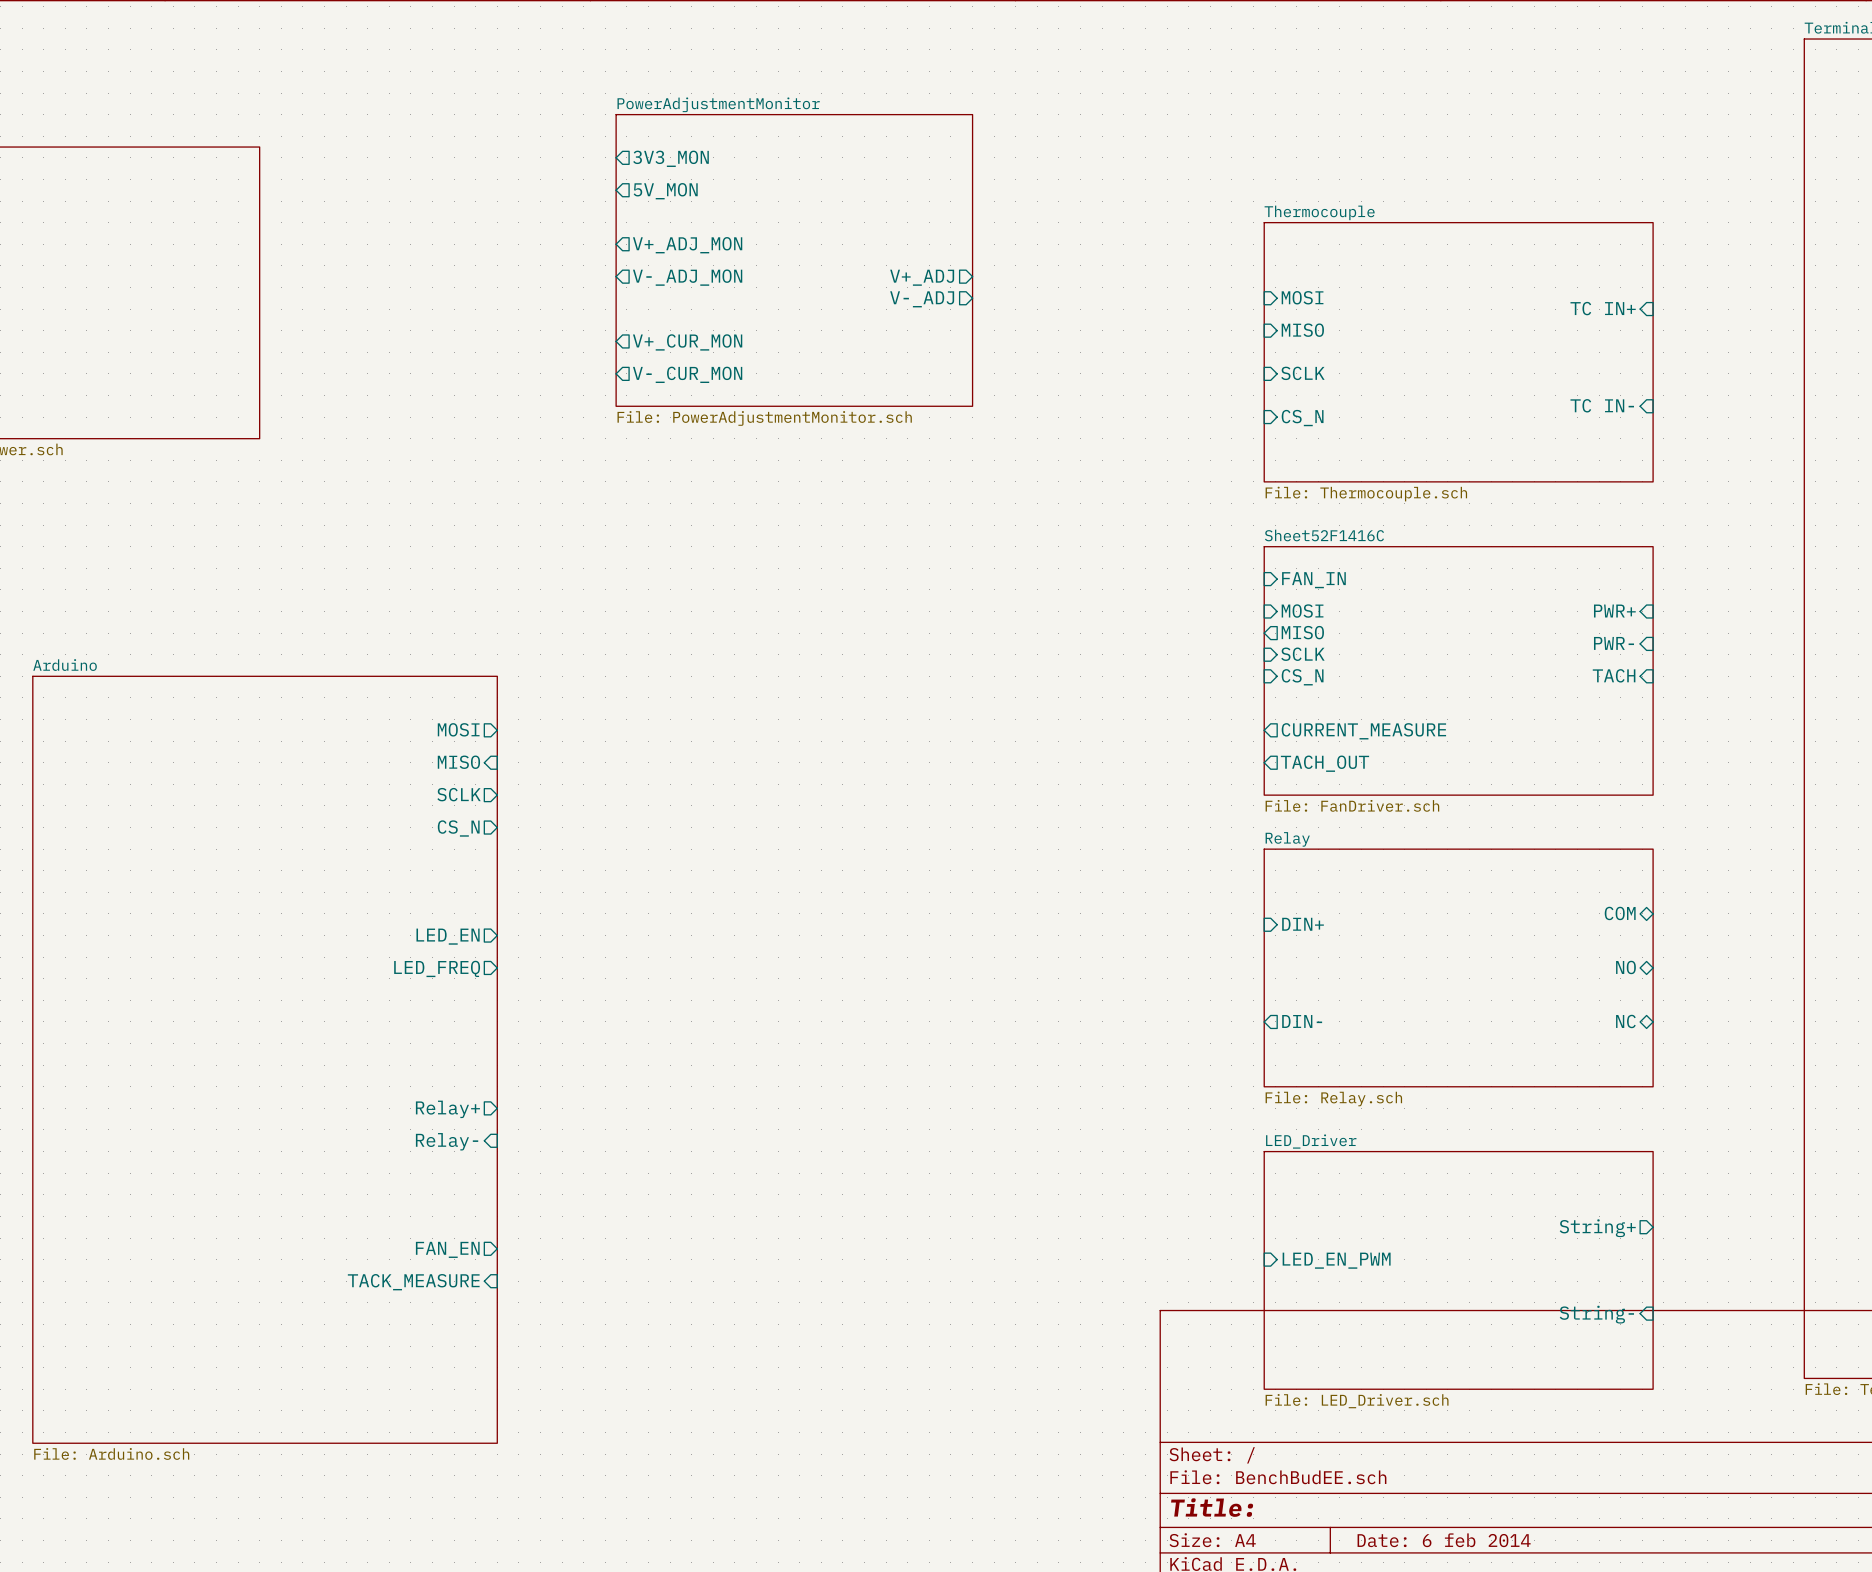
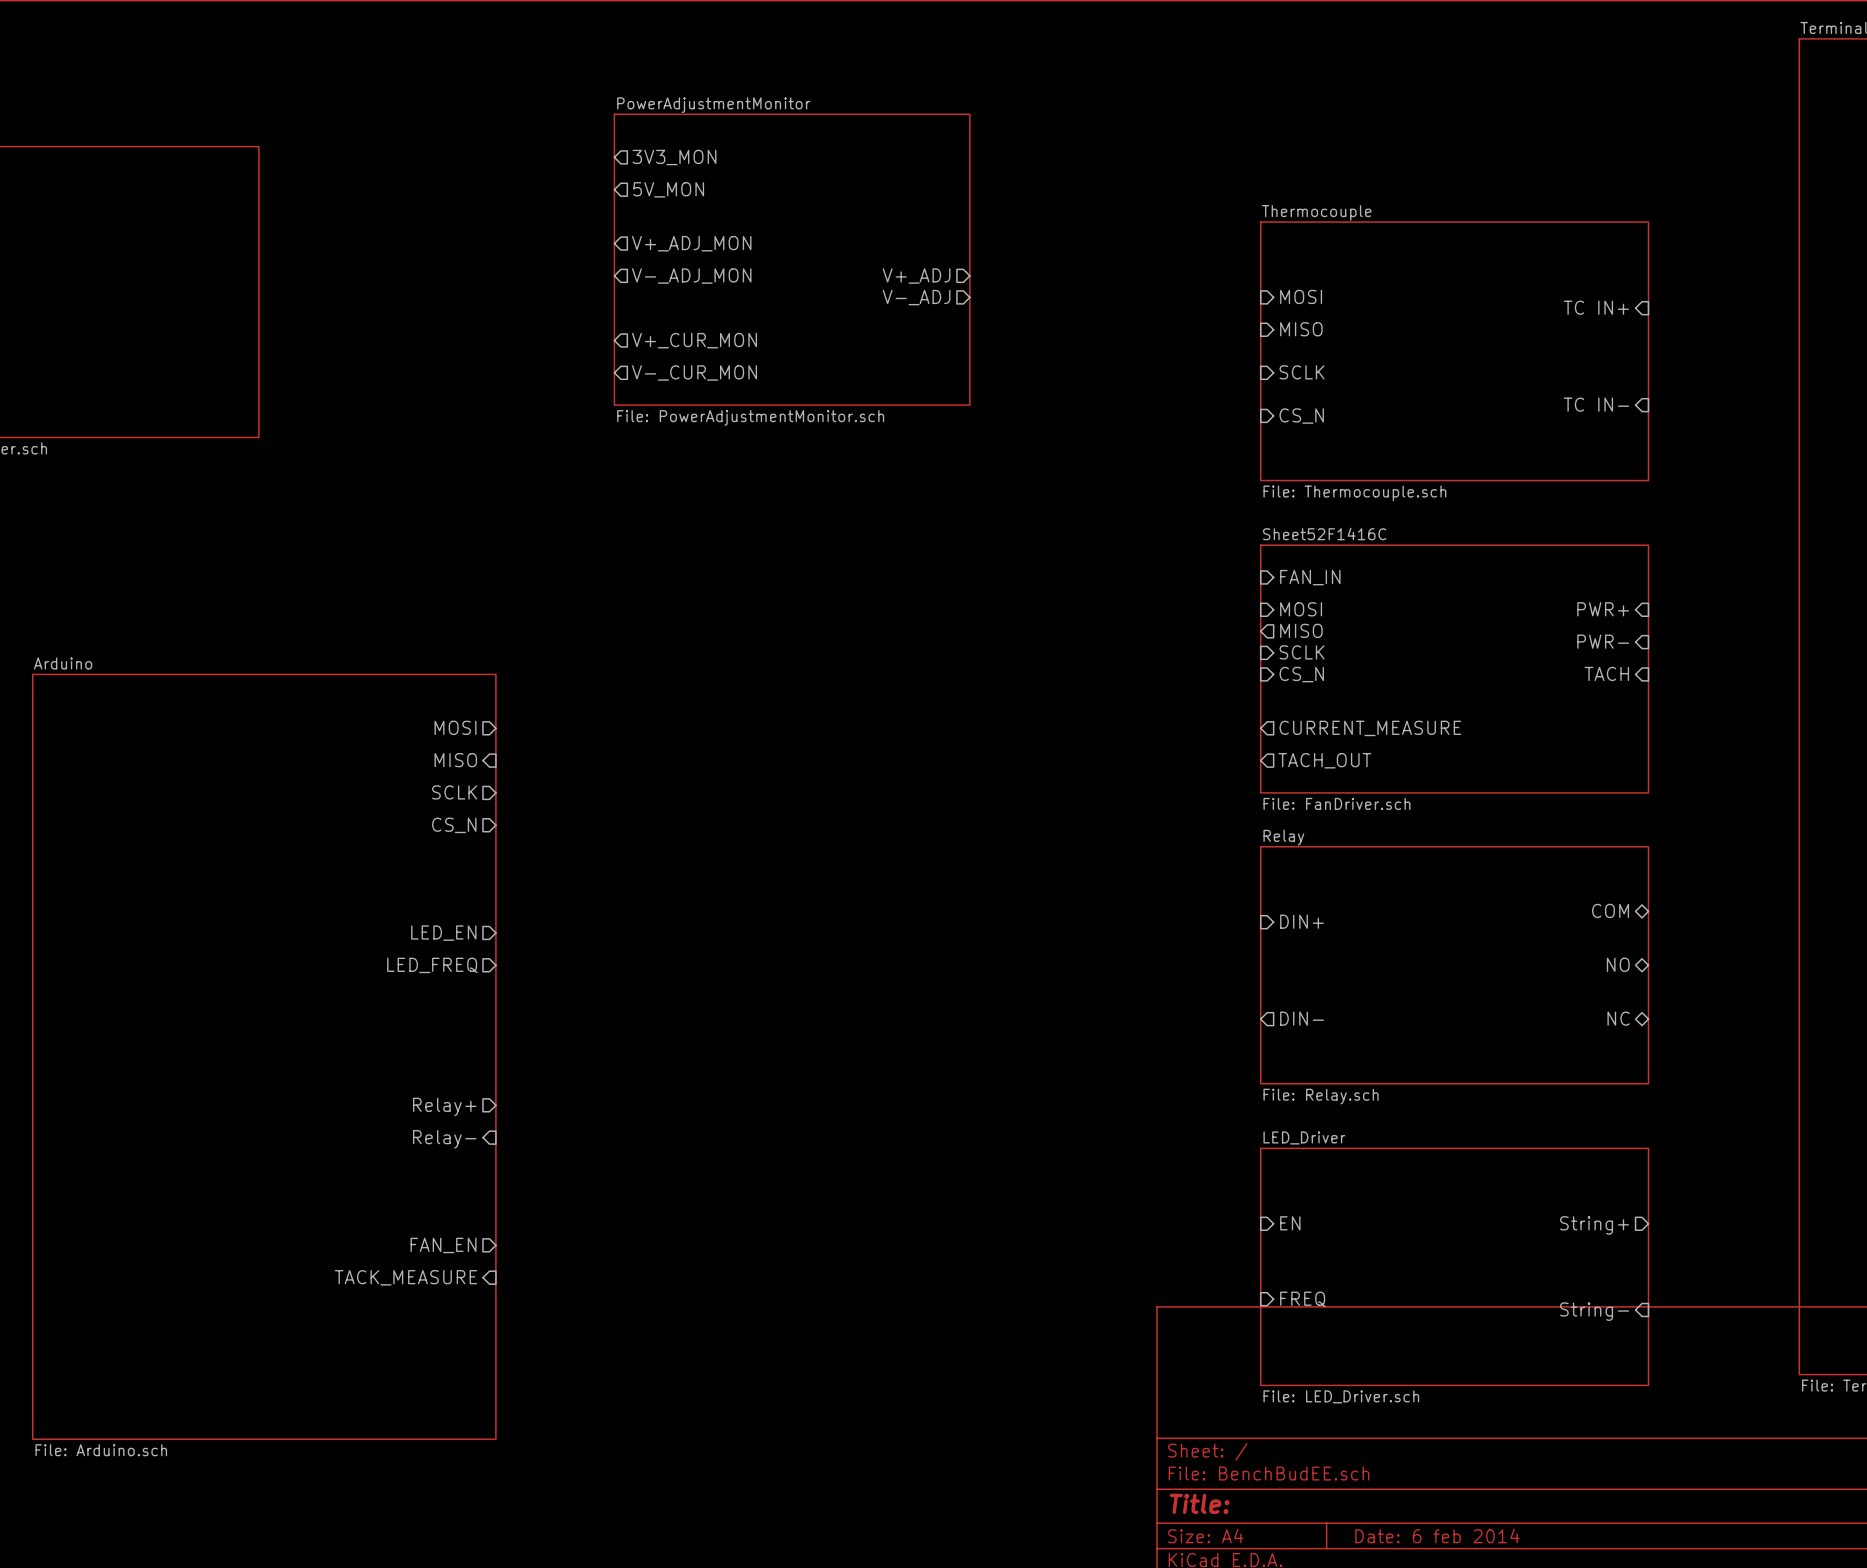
sheet pin: none -> EN (1290, 1223)
sheet pin: LED_EN_PWM (1336, 1260) -> none
sheet pin: none -> FREQ (1302, 1299)

